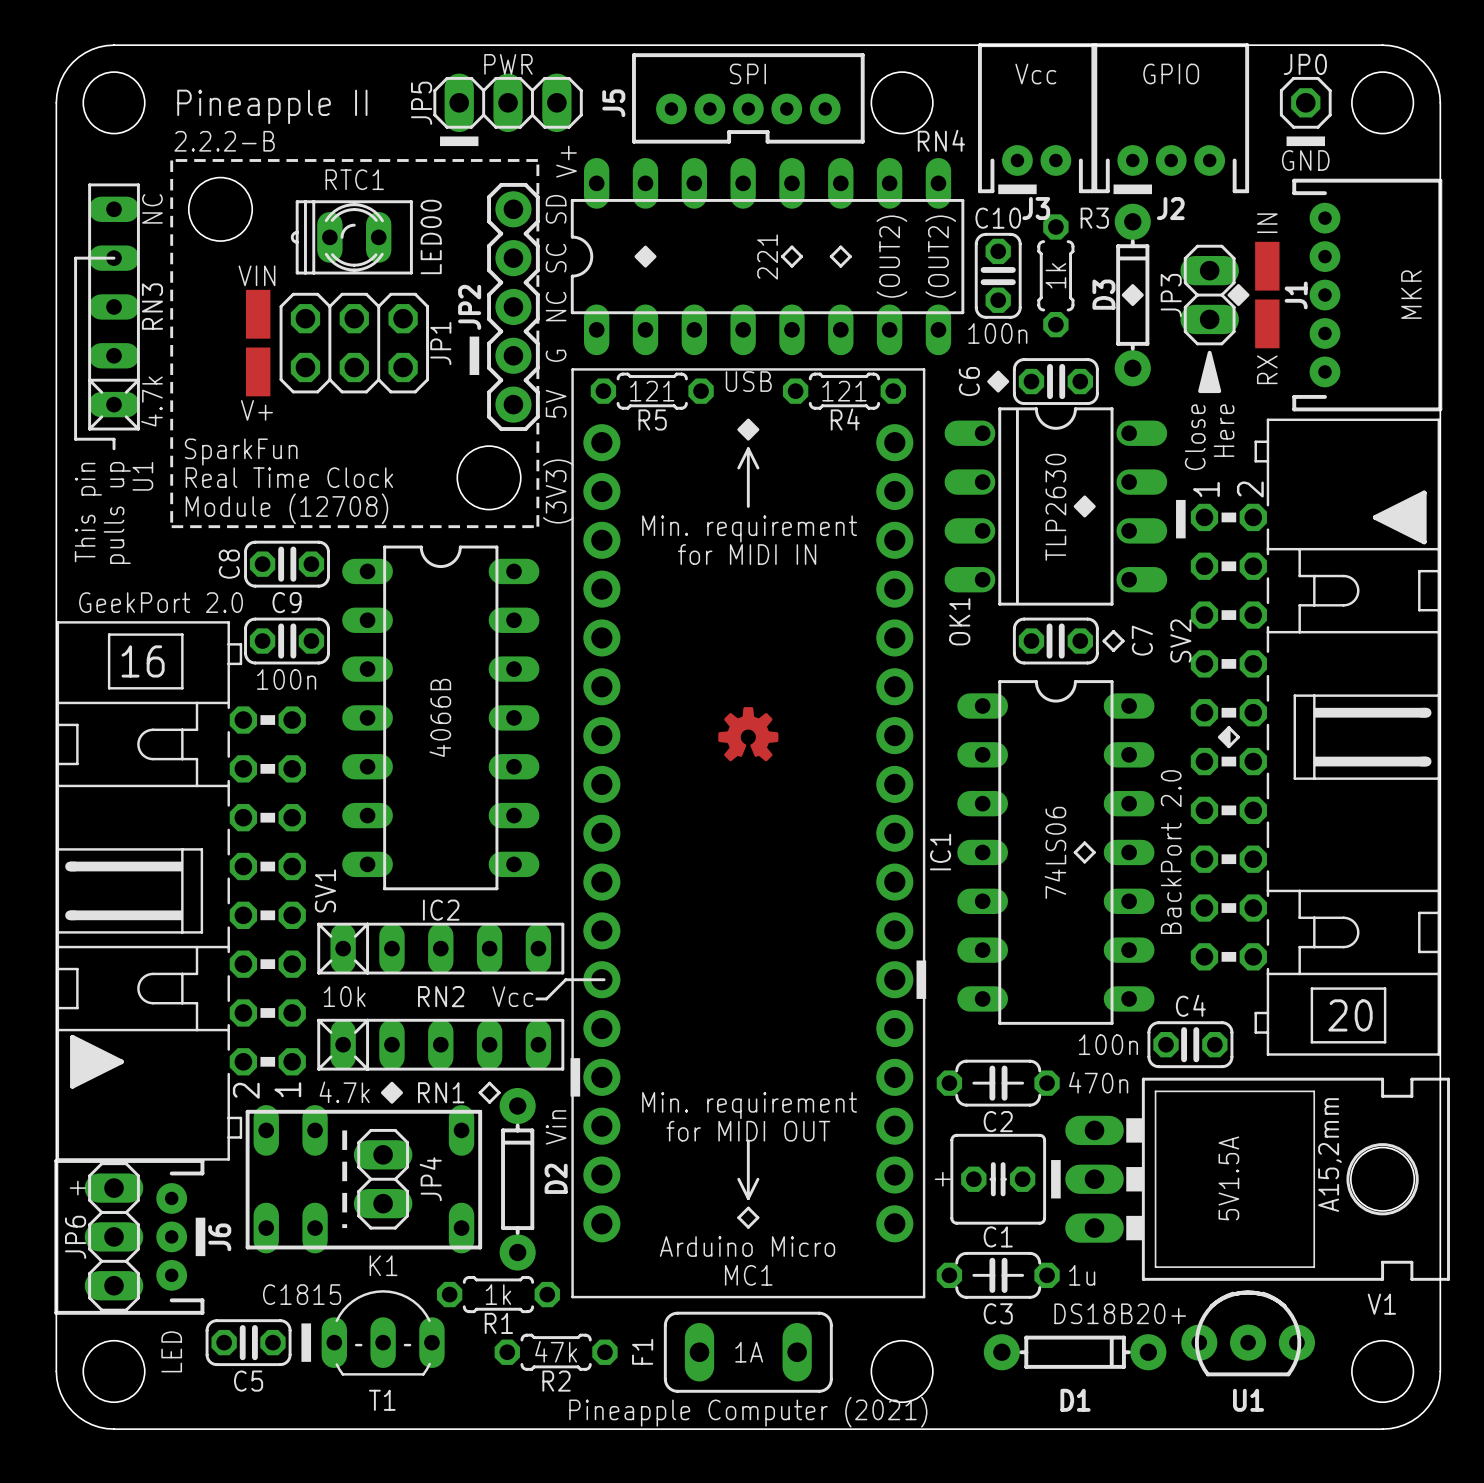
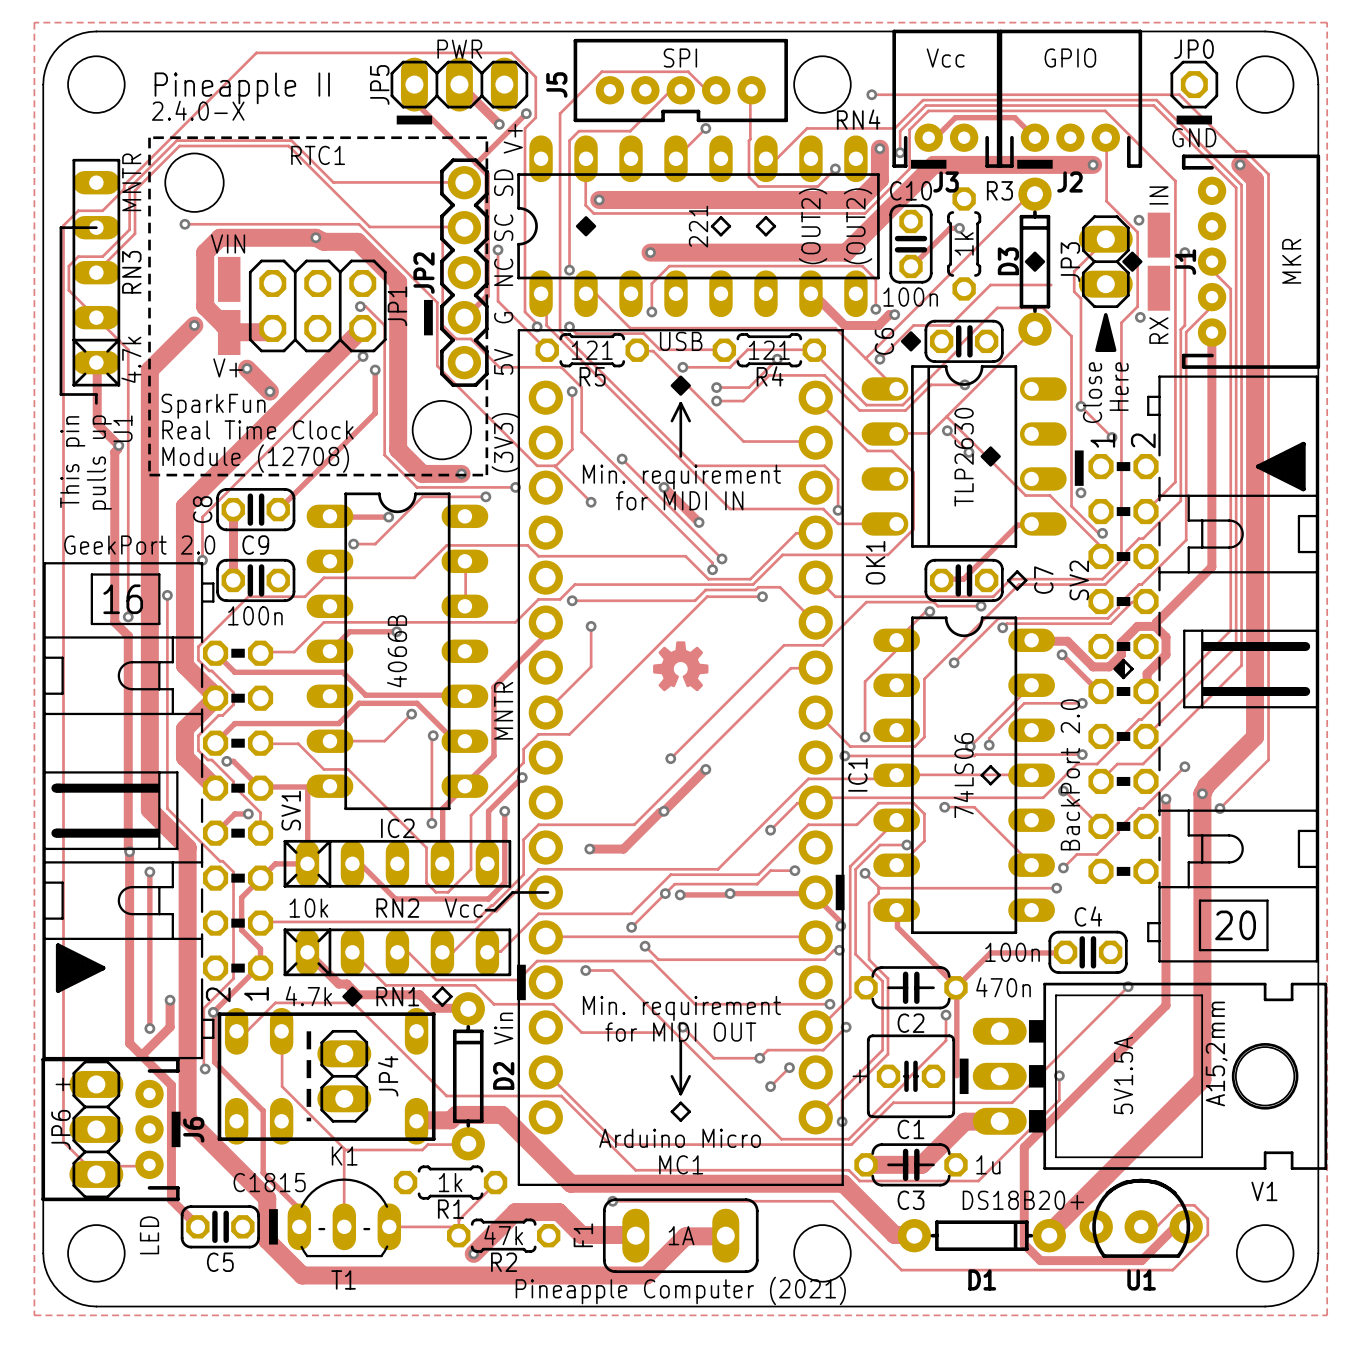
zone outline: none -> (34, 22) (1327, 22) (1327, 1315) (34, 1315) (34, 22)
track: none -> (414, 84) (415, 102) (487, 174) (487, 295) (464, 317)
track: none -> (459, 84) (499, 124)
track: none -> (680, 90) (670, 90) (630, 131) (578, 131) (569, 140) (569, 270)
track: none -> (716, 90) (705, 89) (688, 71) (601, 71) (560, 113) (560, 330) (695, 465) (824, 465) (838, 479) (838, 510)
track: none -> (751, 90) (749, 177) (758, 186) (817, 186) (835, 168)
track: none -> (871, 94) (1179, 94) (1236, 151) (1245, 151) (1268, 174) (1268, 760) (1219, 808)
via: none -> (871, 94)
track: none -> (526, 113) (476, 163)
via: none -> (526, 113)
text: 2.2.2-B (224, 141) -> 2.4.0-X (198, 110)
via: none -> (499, 124)
track: none -> (705, 128) (676, 158)
via: none -> (705, 128)
track: none -> (928, 137) (936, 136) (955, 117) (1014, 117) (1034, 137)
track: none -> (1105, 137) (1106, 201) (1137, 232) (1137, 306) (1121, 322) (1121, 560) (1102, 579) (1010, 579) (993, 596) (835, 596) (815, 577)
track: none -> (879, 148) (879, 179) (859, 199) (599, 199)
via: none -> (879, 148)
track: none -> (900, 152) (900, 131) (925, 105) (1153, 105) (1236, 187) (1236, 646) (1146, 736)
via: none -> (900, 152)
track: none -> (586, 158) (585, 205) (593, 213) (865, 213) (909, 168) (909, 129) (928, 110) (1105, 110) (1175, 181) (1175, 482) (1146, 511)
track: none -> (765, 158) (777, 158) (807, 128) (894, 128) (923, 100) (1156, 100) (1241, 185) (1241, 665) (1143, 764) (1117, 764) (1101, 781)
track: none -> (1093, 164) (933, 164) (846, 252) (650, 252)
via: none -> (1093, 164)
track: none -> (1240, 164) (1255, 179) (1255, 737) (1206, 785) (1202, 793) (1202, 1079) (1049, 1232) (1049, 1235)
via: none -> (1240, 164)
via: none -> (835, 168)
text: NC (152, 208) -> MNTR (131, 182)
track: none -> (464, 182) (333, 182) (291, 140) (176, 140) (129, 187) (129, 229) (102, 256) (78, 256) (68, 266) (68, 290) (128, 349) (128, 616)
track: none -> (1034, 194) (1029, 194) (865, 358)
via: none -> (599, 199)
LED00: (351, 237) -> none
via: none -> (1138, 220)
track: none -> (184, 224) (359, 224) (437, 302) (437, 365) (537, 465) (554, 465) (591, 502)
via: none -> (184, 224)
track: none -> (442, 226) (442, 325) (456, 338) (471, 338) (499, 367) (561, 367) (581, 387) (581, 432) (712, 562) (712, 569)
track: none -> (464, 227) (369, 226) (288, 146) (179, 146) (135, 190) (135, 233) (96, 272)
track: none -> (959, 228) (950, 228) (911, 266)
via: none -> (959, 228)
via: none -> (315, 237)
track: none -> (1105, 239) (1074, 271) (1074, 291) (1080, 298) (1080, 406) (1112, 437)
track: none -> (498, 249) (498, 301) (547, 350)
via: none -> (498, 249)
via: none -> (650, 252)
track: none -> (1184, 252) (1184, 325) (1180, 329) (1180, 500) (1143, 538) (1138, 538) (1126, 550) (1126, 562) (1105, 584) (1018, 584) (924, 679) (924, 737) (914, 746) (850, 746) (815, 712)
via: none -> (1184, 252)
track: none -> (1212, 261) (1213, 271) (1230, 289) (1230, 630) (1141, 719) (1138, 719) (1118, 739) (1118, 742) (1097, 764) (1076, 764) (1043, 797) (820, 797) (815, 803) (797, 803) (770, 830)
via: none -> (569, 270)
track: none -> (1051, 285) (990, 285) (950, 325) (913, 325) (879, 359)
track: none -> (541, 293) (546, 299) (546, 325) (730, 509) (823, 509) (838, 523) (896, 523)
track: none -> (586, 293) (596, 294) (630, 328) (835, 328) (896, 389)
track: none -> (810, 293) (844, 325) (878, 325) (889, 314) (894, 314)
track: none -> (1211, 297) (1211, 306) (1186, 332) (1186, 540) (1141, 584) (1138, 584) (1107, 618) (998, 618) (954, 662)
track: none -> (360, 306) (365, 306) (384, 325) (384, 455) (417, 487) (515, 487)
via: none -> (360, 306)
track: none -> (875, 309) (875, 279) (862, 266) (669, 266) (651, 283) (651, 311)
via: none -> (875, 309)
via: none -> (651, 311)
via: none -> (894, 314)
via: none -> (1140, 317)
track: none -> (194, 325) (149, 370) (149, 809) (187, 847) (187, 1118) (267, 1198) (267, 1240) (302, 1275) (646, 1275) (685, 1236) (725, 1235)
via: none -> (194, 325)
track: none -> (537, 326) (537, 324) (525, 311) (525, 128) (535, 117) (535, 77) (511, 52) (256, 52) (124, 185) (124, 189) (102, 210) (78, 210) (63, 225) (63, 1141) (96, 1174) (105, 1166) (149, 1164)
via: none -> (537, 326)
track: none -> (569, 326) (576, 333) (643, 333) (659, 349) (724, 350)
via: none -> (569, 326)
track: none -> (272, 328) (269, 332) (229, 332) (205, 306) (205, 252) (220, 237) (315, 237) (323, 241) (357, 241) (398, 282) (398, 449) (422, 473) (461, 473)
track: none -> (362, 328) (184, 506) (184, 665) (215, 698) (184, 728) (184, 757) (215, 788)
track: none -> (1034, 329) (929, 433) (896, 433)
track: none -> (1212, 332) (1211, 567) (1156, 622) (1155, 626)
track: none -> (637, 350) (653, 351) (743, 441) (815, 442)
track: none -> (363, 356) (202, 517) (202, 560)
via: none -> (363, 356)
track: none -> (777, 359) (749, 387) (716, 387)
via: none -> (777, 359)
via: none -> (879, 359)
track: none -> (96, 362) (97, 423) (118, 445) (114, 452) (114, 622) (128, 635) (129, 1043) (171, 1085) (171, 1199) (197, 1226)
track: none -> (682, 367) (730, 367) (747, 349) (813, 349) (815, 353) (866, 405) (902, 405) (997, 307) (1043, 307) (1071, 336) (1071, 506) (1098, 533) (1102, 533)
via: none -> (682, 367)
track: none -> (247, 368) (269, 391)
via: none -> (247, 368)
track: none -> (375, 370) (375, 413) (278, 509)
via: none -> (375, 370)
track: none -> (964, 384) (931, 384) (905, 410) (859, 410) (824, 375) (769, 375) (743, 401) (716, 401)
via: none -> (964, 384)
via: none -> (716, 387)
via: none -> (269, 391)
track: none -> (572, 391) (572, 449) (555, 466)
via: none -> (572, 391)
track: none -> (815, 397) (867, 450) (892, 450) (913, 472) (913, 529) (888, 554) (782, 554) (753, 584) (574, 584) (560, 599) (538, 599) (515, 622) (323, 622) (294, 652) (260, 653)
via: none -> (716, 401)
via: none -> (1080, 406)
track: none -> (946, 416) (1025, 495) (1049, 495) (1099, 545) (1101, 556)
track: none -> (947, 430) (968, 452)
via: none -> (947, 430)
via: none -> (1112, 437)
via: none -> (118, 445)
via: none -> (968, 452)
track: none -> (622, 459) (722, 558)
via: none -> (622, 459)
via: none -> (461, 473)
via: none -> (515, 487)
track: none -> (663, 487) (699, 522)
via: none -> (663, 487)
via: none -> (1080, 492)
track: none -> (485, 496) (422, 496) (375, 544) (353, 544)
via: none -> (485, 496)
via: none -> (591, 502)
track: none -> (233, 509) (233, 580)
via: none -> (838, 510)
track: none -> (329, 516) (388, 517)
via: none -> (388, 517)
via: none -> (699, 522)
track: none -> (1031, 523) (1017, 525) (963, 579) (941, 580)
track: none -> (815, 532) (796, 533) (750, 579) (708, 579) (685, 556) (538, 556) (527, 545) (446, 545) (414, 577) (323, 577) (305, 596) (248, 596) (198, 646) (198, 660) (233, 692) (233, 704) (222, 715) (218, 715) (198, 735) (198, 750) (207, 760) (211, 760) (233, 781) (233, 785) (260, 812) (260, 832)
via: none -> (1102, 533)
via: none -> (353, 544)
via: none -> (722, 558)
via: none -> (202, 560)
track: none -> (464, 561) (464, 606)
via: none -> (712, 569)
track: none -> (167, 595) (167, 808) (220, 861) (222, 861) (233, 872) (233, 978) (203, 1008) (205, 1069)
via: none -> (167, 595)
track: none -> (762, 596) (707, 596) (569, 734) (538, 734) (523, 749) (523, 762) (471, 815) (471, 869) (448, 892) (435, 892) (426, 882) (426, 847) (348, 769) (323, 769) (298, 743) (260, 743)
via: none -> (762, 596)
track: none -> (572, 600) (695, 600) (705, 589) (755, 589) (758, 587) (780, 587) (815, 622)
via: none -> (572, 600)
track: none -> (1146, 601) (1132, 602) (1110, 623) (1006, 623) (1002, 627)
track: none -> (981, 606) (937, 606) (933, 602) (866, 602) (823, 645) (784, 645) (670, 758)
via: none -> (981, 606)
track: none -> (929, 611) (925, 611) (896, 640) (896, 650) (865, 681) (865, 737)
via: none -> (929, 611)
via: none -> (128, 616)
track: none -> (545, 622) (545, 635) (493, 687) (493, 755) (442, 808) (442, 863)
track: none -> (591, 626) (591, 666) (545, 712)
via: none -> (591, 626)
track: none -> (1155, 626) (1165, 637) (1165, 654) (1147, 673) (1146, 691)
track: none -> (1155, 626) (1137, 626) (1121, 642) (1121, 654) (1109, 666) (1093, 666) (1067, 641) (1031, 640)
via: none -> (1002, 627)
track: none -> (396, 631) (349, 631) (329, 651)
via: none -> (396, 631)
track: none -> (215, 653) (234, 672) (342, 672) (365, 695) (464, 696)
track: none -> (1062, 654) (1101, 691)
via: none -> (1062, 654)
via: none -> (954, 662)
track: none -> (815, 667) (790, 668) (634, 824) (538, 824) (523, 839) (523, 874) (475, 921) (260, 923)
track: none -> (1031, 685) (970, 746)
track: none -> (1082, 703) (1024, 703) (989, 738) (989, 745)
via: none -> (1082, 703)
text: none -> MNTR (503, 710)
track: none -> (411, 714) (384, 741) (329, 741)
via: none -> (411, 714)
track: none -> (433, 735) (431, 823)
via: none -> (433, 735)
via: none -> (865, 737)
track: none -> (464, 741) (454, 741) (417, 703) (359, 703) (338, 723) (234, 723) (215, 743)
via: none -> (989, 745)
via: none -> (970, 746)
track: none -> (1082, 754) (844, 755)
via: none -> (1082, 754)
via: none -> (844, 755)
via: none -> (670, 758)
track: none -> (226, 761) (233, 761) (260, 788) (329, 786) (307, 788) (307, 863) (275, 863) (241, 897) (241, 930) (260, 948) (260, 967)
via: none -> (226, 761)
track: none -> (1184, 766) (1143, 808) (1138, 808) (1118, 828) (1118, 832) (1097, 854) (1076, 854) (1063, 867)
via: none -> (1184, 766)
track: none -> (705, 769) (623, 849) (589, 849)
via: none -> (705, 769)
track: none -> (1031, 775) (897, 774) (893, 778) (808, 778) (717, 869) (538, 869) (453, 951) (442, 952)
track: none -> (522, 777) (488, 811) (487, 863)
via: none -> (522, 777)
track: none -> (1063, 791) (1101, 826)
via: none -> (1063, 791)
via: none -> (1202, 793)
track: none -> (1165, 799) (1165, 1005) (1024, 1147) (1024, 1244) (1040, 1260) (1141, 1260) (1175, 1226) (1186, 1226)
via: none -> (1165, 799)
track: none -> (944, 807) (974, 807) (1031, 865)
via: none -> (944, 807)
via: none -> (1219, 808)
track: none -> (504, 811) (504, 882) (488, 898) (395, 898) (360, 863) (352, 863)
via: none -> (504, 811)
via: none -> (663, 811)
track: none -> (248, 813) (234, 813) (215, 833)
via: none -> (248, 813)
track: none -> (896, 820) (850, 866) (850, 997) (820, 1027) (815, 1027)
via: none -> (431, 823)
via: none -> (770, 830)
track: none -> (906, 845) (879, 845) (855, 869) (855, 954) (882, 981) (882, 1050) (815, 1117)
via: none -> (906, 845)
via: none -> (589, 849)
via: none -> (129, 851)
track: none -> (896, 865) (901, 863) (924, 840) (924, 813) (913, 803) (878, 803) (856, 824) (808, 824) (758, 874) (670, 874) (631, 913) (538, 913) (500, 951) (487, 952)
via: none -> (1063, 867)
track: none -> (794, 870) (770, 870) (757, 884) (674, 884) (631, 927)
via: none -> (794, 870)
track: none -> (149, 872) (149, 1028)
via: none -> (149, 872)
track: none -> (865, 873) (879, 888) (1056, 888)
via: none -> (865, 873)
track: none -> (879, 887) (878, 893) (869, 903) (869, 959) (888, 978) (888, 1054) (842, 1100) (842, 1121)
via: none -> (1056, 888)
via: none -> (665, 893)
via: none -> (730, 893)
track: none -> (680, 894) (815, 892) (815, 896) (840, 921) (840, 925)
via: none -> (680, 894)
track: none -> (896, 910) (897, 927) (955, 987)
via: none -> (840, 925)
via: none -> (631, 927)
track: none -> (545, 937) (815, 937)
track: none -> (645, 946) (658, 959) (824, 959) (834, 950) (839, 950)
via: none -> (645, 946)
via: none -> (839, 950)
track: none -> (307, 952) (338, 984) (346, 984) (357, 994) (419, 994) (433, 1008) (468, 1008)
track: none -> (352, 952) (386, 985) (475, 985) (493, 1004) (553, 1004) (581, 1032) (661, 1032)
track: none -> (397, 952) (408, 952) (435, 979) (518, 979) (537, 961) (651, 961) (695, 1004) (829, 1004)
track: none -> (1065, 952) (990, 952) (955, 987)
track: none -> (260, 968) (257, 967) (213, 1012) (214, 1062) (263, 1110) (263, 1172) (298, 1208) (299, 1226)
track: none -> (585, 970) (612, 970) (781, 1139) (848, 1139) (946, 1040) (946, 1015)
via: none -> (585, 970)
track: none -> (1128, 986) (1012, 1102) (893, 1102) (851, 1144) (618, 1144) (545, 1072)
via: none -> (1128, 986)
track: none -> (955, 987) (956, 1075)
track: none -> (170, 1000) (170, 1027) (141, 1055)
via: none -> (170, 1000)
via: none -> (829, 1004)
via: none -> (213, 1012)
via: none -> (946, 1015)
track: none -> (682, 1027) (713, 1058) (759, 1058) (767, 1050) (823, 1050) (846, 1027)
via: none -> (682, 1027)
via: none -> (846, 1027)
via: none -> (149, 1028)
track: none -> (236, 1031) (247, 1031) (275, 1002) (353, 1002) (446, 1096) (561, 1096) (635, 1170) (848, 1170) (859, 1181) (978, 1181) (1059, 1100) (1059, 1075)
track: none -> (281, 1031) (282, 1086) (344, 1148) (344, 1226)
via: none -> (759, 1058)
track: none -> (789, 1067) (770, 1086)
via: none -> (789, 1067)
via: none -> (205, 1069)
via: none -> (1059, 1075)
via: none -> (770, 1086)
track: none -> (416, 1121) (450, 1120) (456, 1114) (502, 1114) (570, 1183) (843, 1183) (894, 1235) (914, 1235)
via: none -> (842, 1121)
track: none -> (999, 1121) (964, 1121) (921, 1164) (866, 1164)
track: none -> (468, 1143) (427, 1144) (422, 1149) (344, 1149)
track: none -> (495, 1182) (458, 1220) (458, 1235) (458, 1235) (458, 1226) (390, 1226) (389, 1226)
track: none -> (612, 1201) (832, 1201) (901, 1270) (1172, 1270) (1207, 1235) (1207, 1218) (1194, 1205) (1178, 1205) (1157, 1225) (1141, 1226)
via: none -> (612, 1201)
track: none -> (635, 1235) (581, 1235) (558, 1212) (515, 1212) (473, 1253)
via: none -> (473, 1253)

